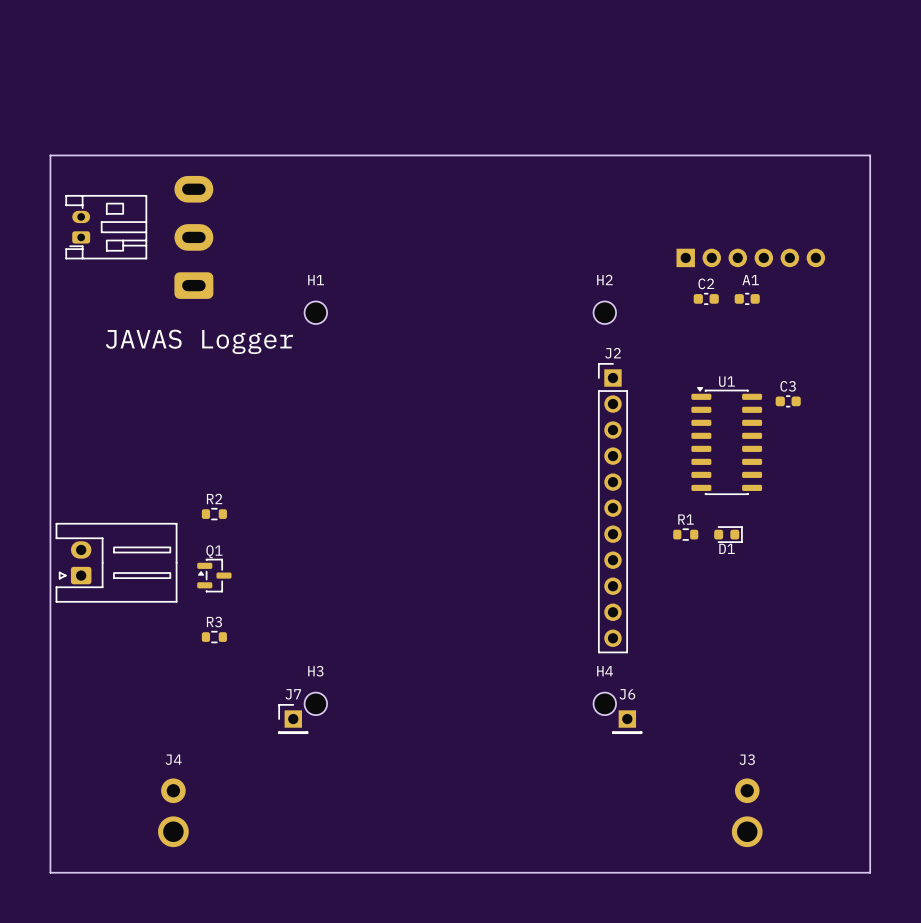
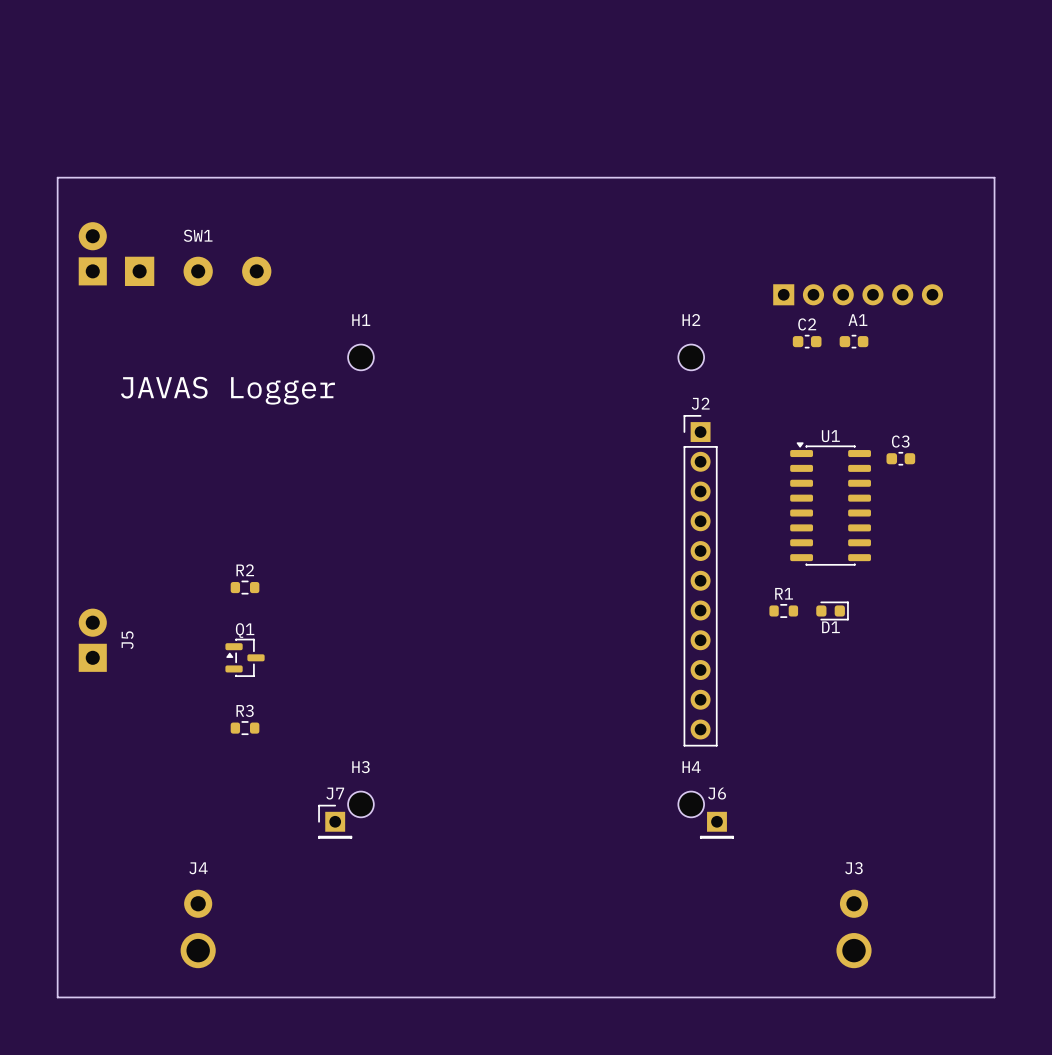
part: none -> (92, 253)
part: (106, 227) -> none
SW1: none -> (198, 271)
part: (193, 237) -> none
J5: none -> (92, 640)
part: (116, 562) -> none

